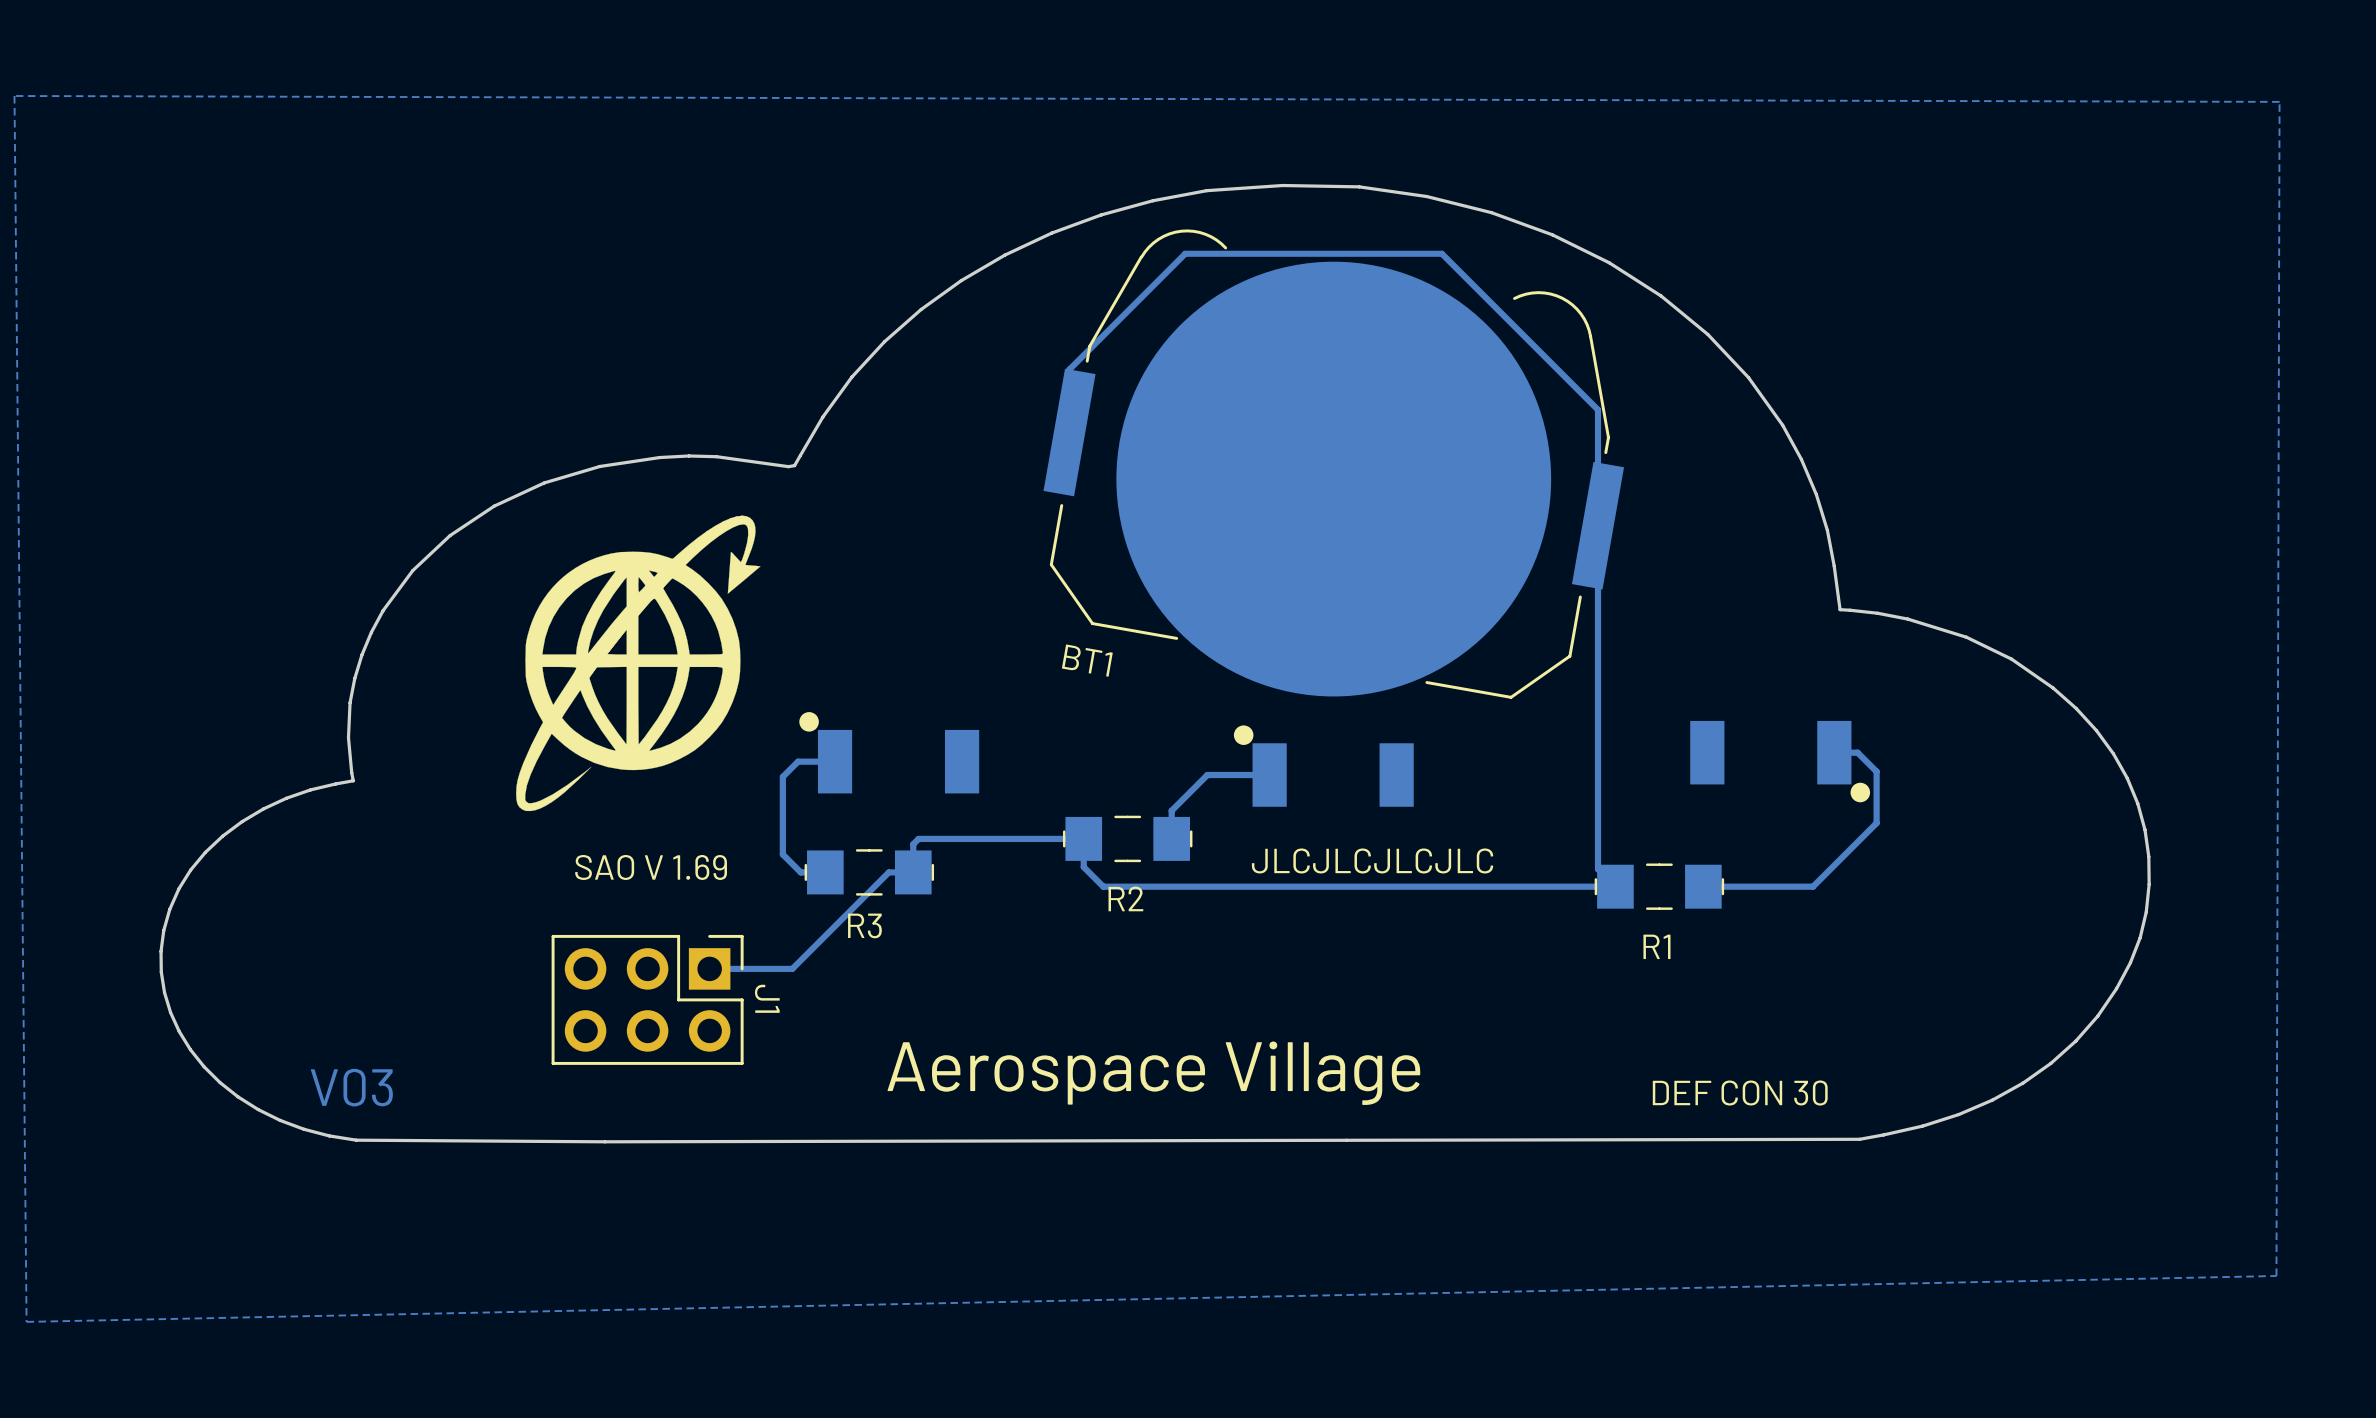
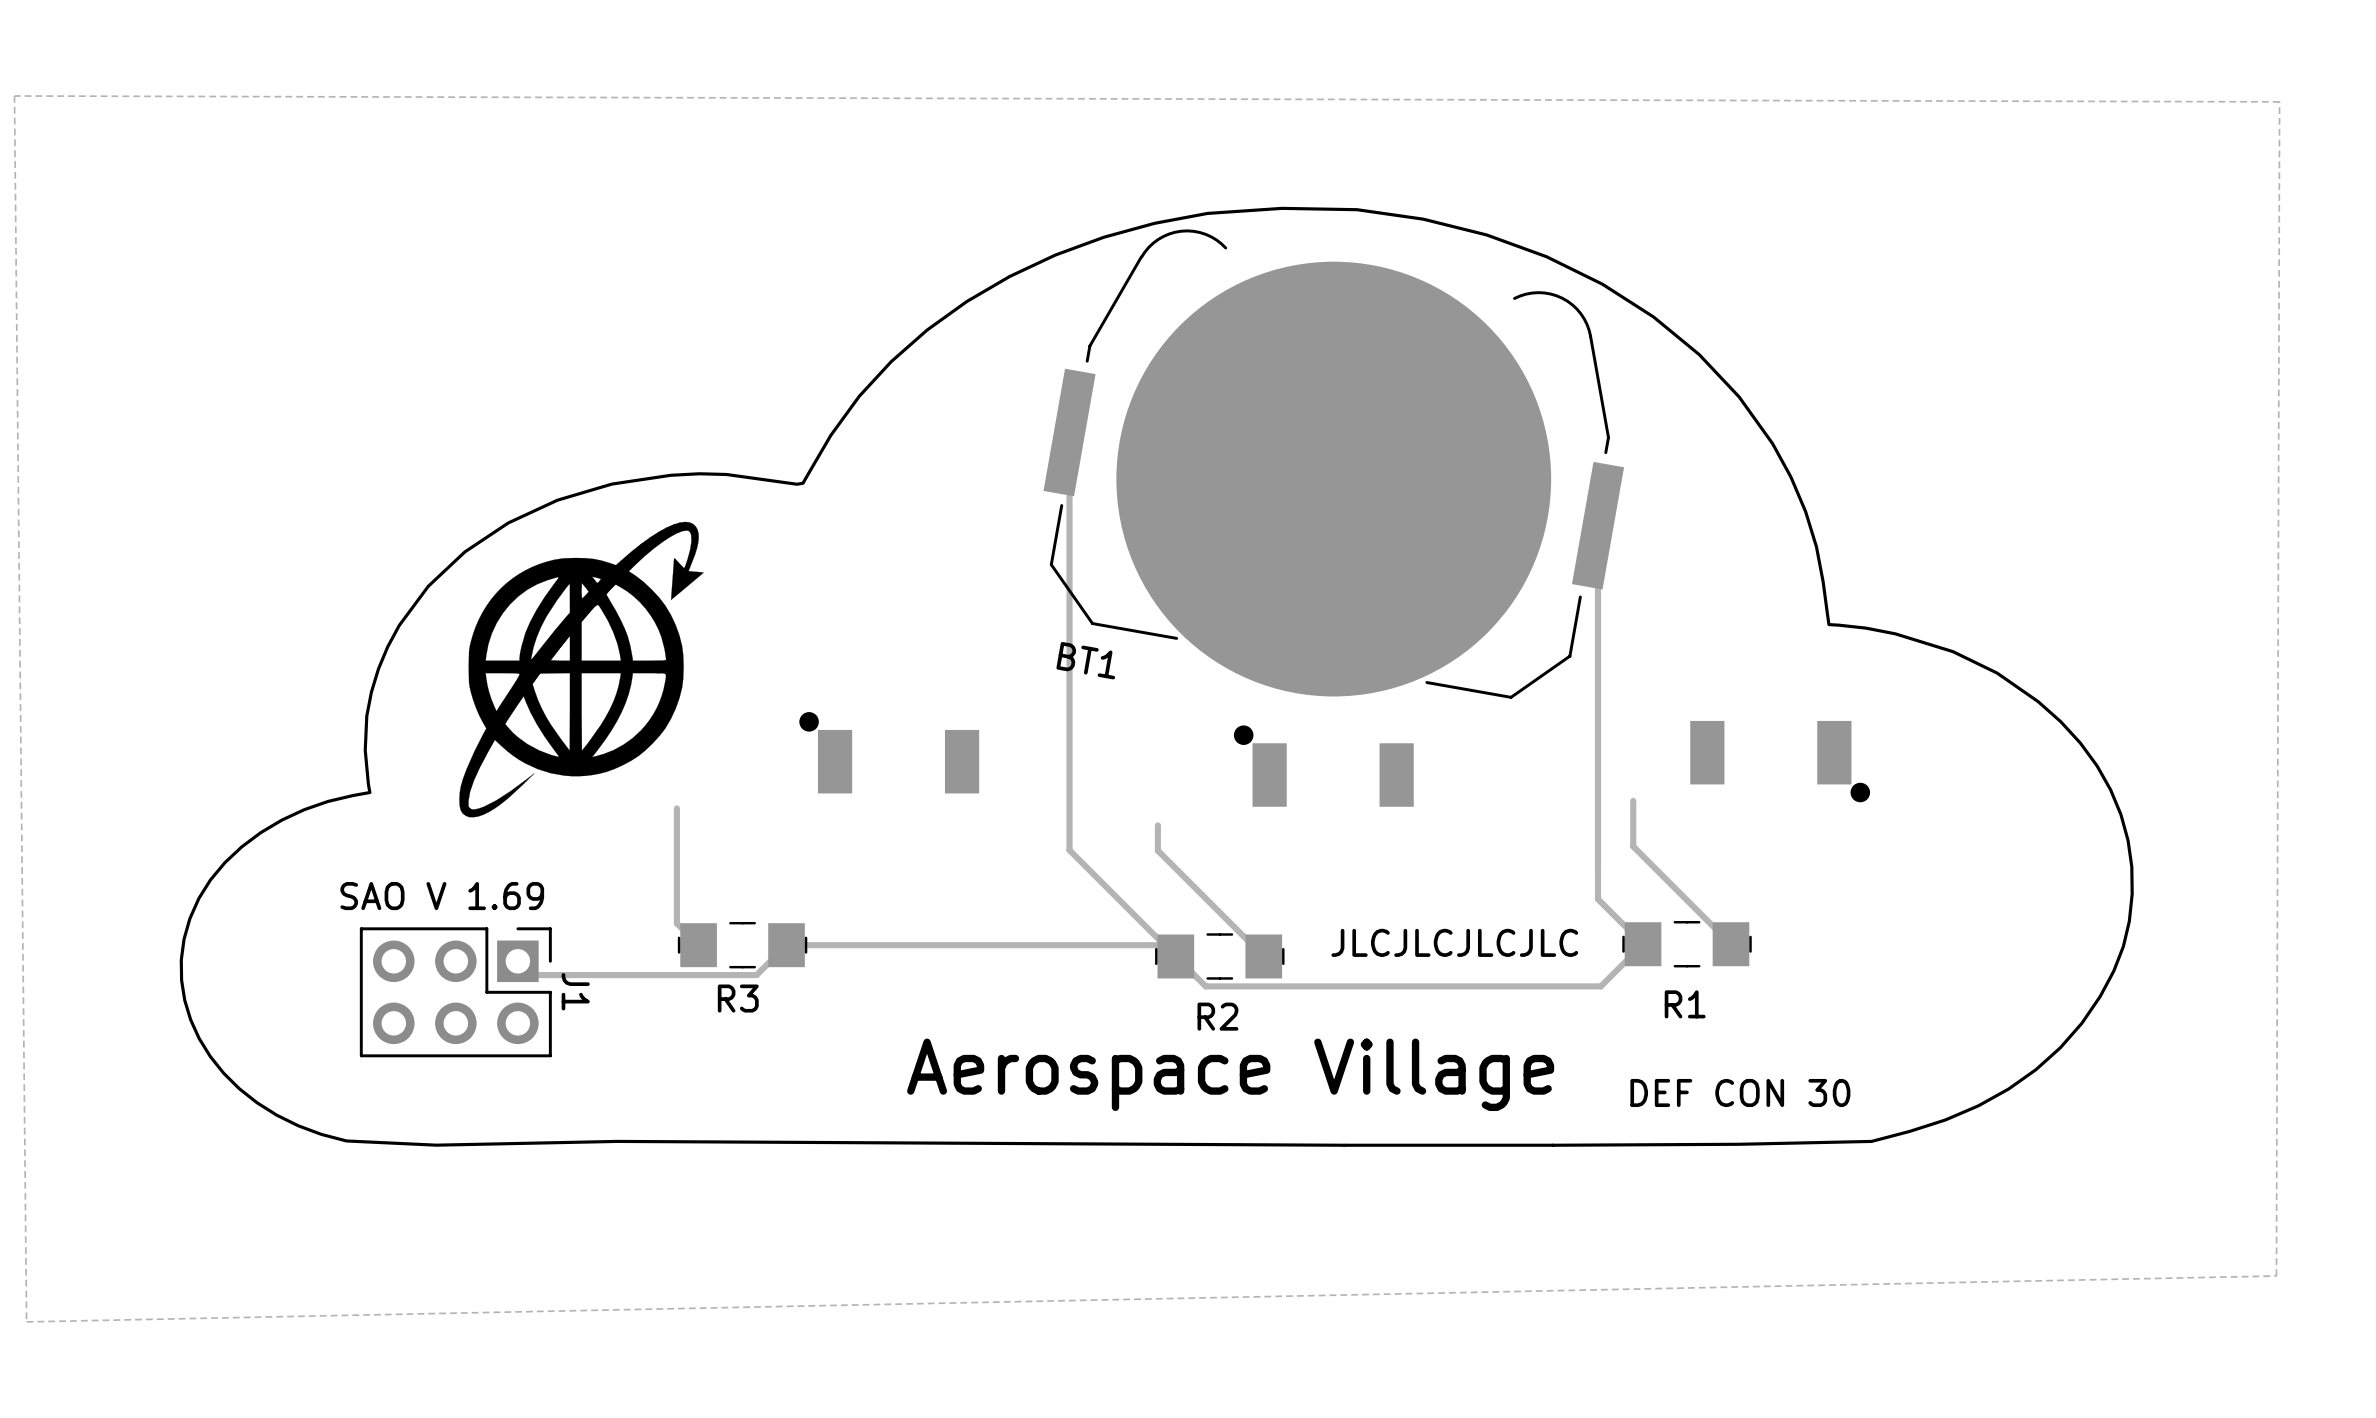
drawing shape: [159, 183, 2151, 1144] -> [179, 206, 2134, 1147]
track: (1069, 432) (1069, 369) (1185, 253) (1441, 253) (1598, 409) (1598, 525) -> (1069, 432) (1069, 850) (1205, 986) (1600, 986) (1643, 944) (1598, 899) (1598, 869)
drawing position: (638, 663) -> (581, 669)
track: (1834, 752) (1857, 752) (1876, 771) (1876, 823) (1813, 886) (1703, 886) -> none
track: (825, 771) (835, 761) (798, 761) (782, 776) (782, 854) (800, 872) (825, 872) -> none
track: (1269, 775) (1207, 775) (1171, 810) (1171, 838) -> none
track: none -> (1633, 800) (1633, 846) (1730, 944)
track: none -> (676, 808) (676, 923) (698, 945)
track: none -> (1157, 825) (1157, 850) (1263, 956)
R2 position: (1127, 838) -> (1219, 956)
text position: JLCJLCJLCJLC (1372, 860) -> JLCJLCJLCJLC (1454, 942)
text position: SAO V 1.69 (651, 867) -> SAO V 1.69 (442, 896)
track: (1598, 869) (1615, 886) (1103, 886) (1083, 867) (1083, 838) (918, 838) (913, 844) (913, 872) (888, 872) (792, 968) (709, 968) -> none
R3 position: (869, 872) -> (742, 945)
R1 position: (1659, 886) -> (1687, 944)
track: none -> (1164, 945) (786, 945) (756, 975) (531, 975) (517, 961)
J1 position: (647, 999) -> (455, 992)
text position: Aerospace Village (1153, 1073) -> Aerospace Village (1230, 1074)
text: V03 (351, 1087) -> none

